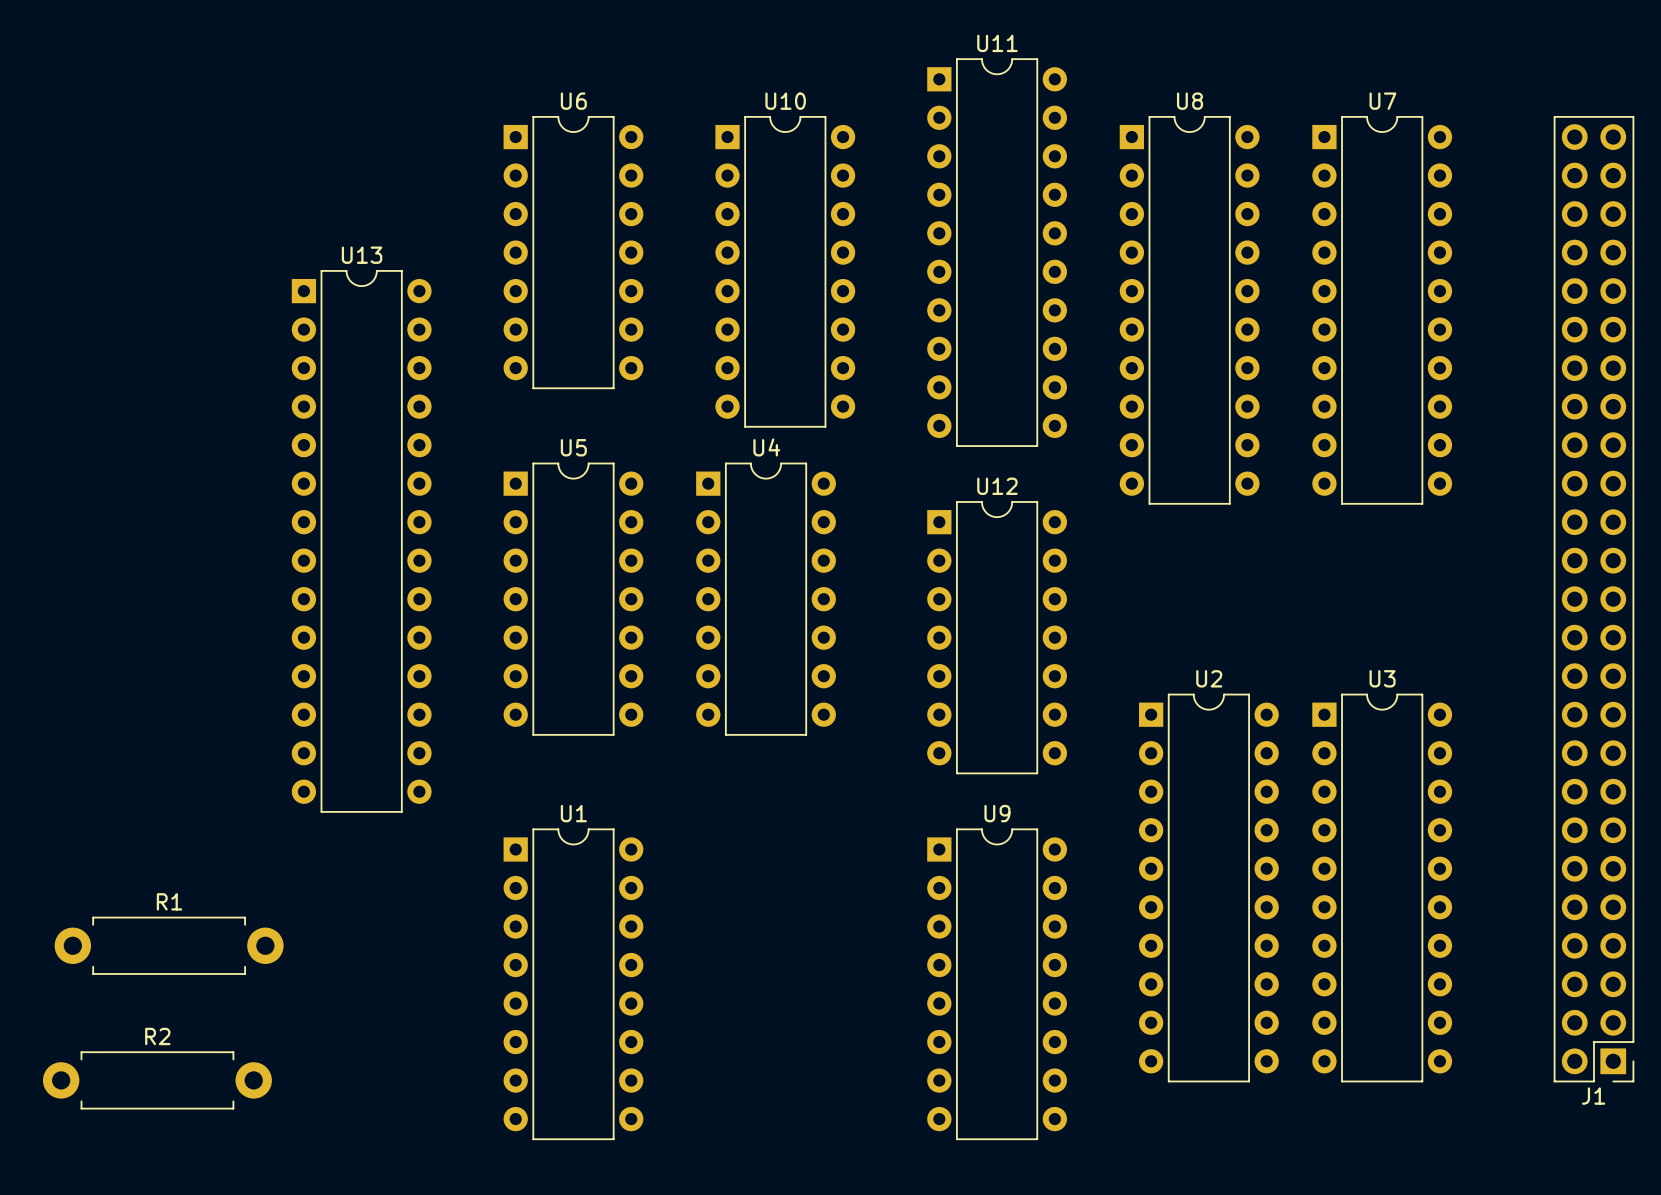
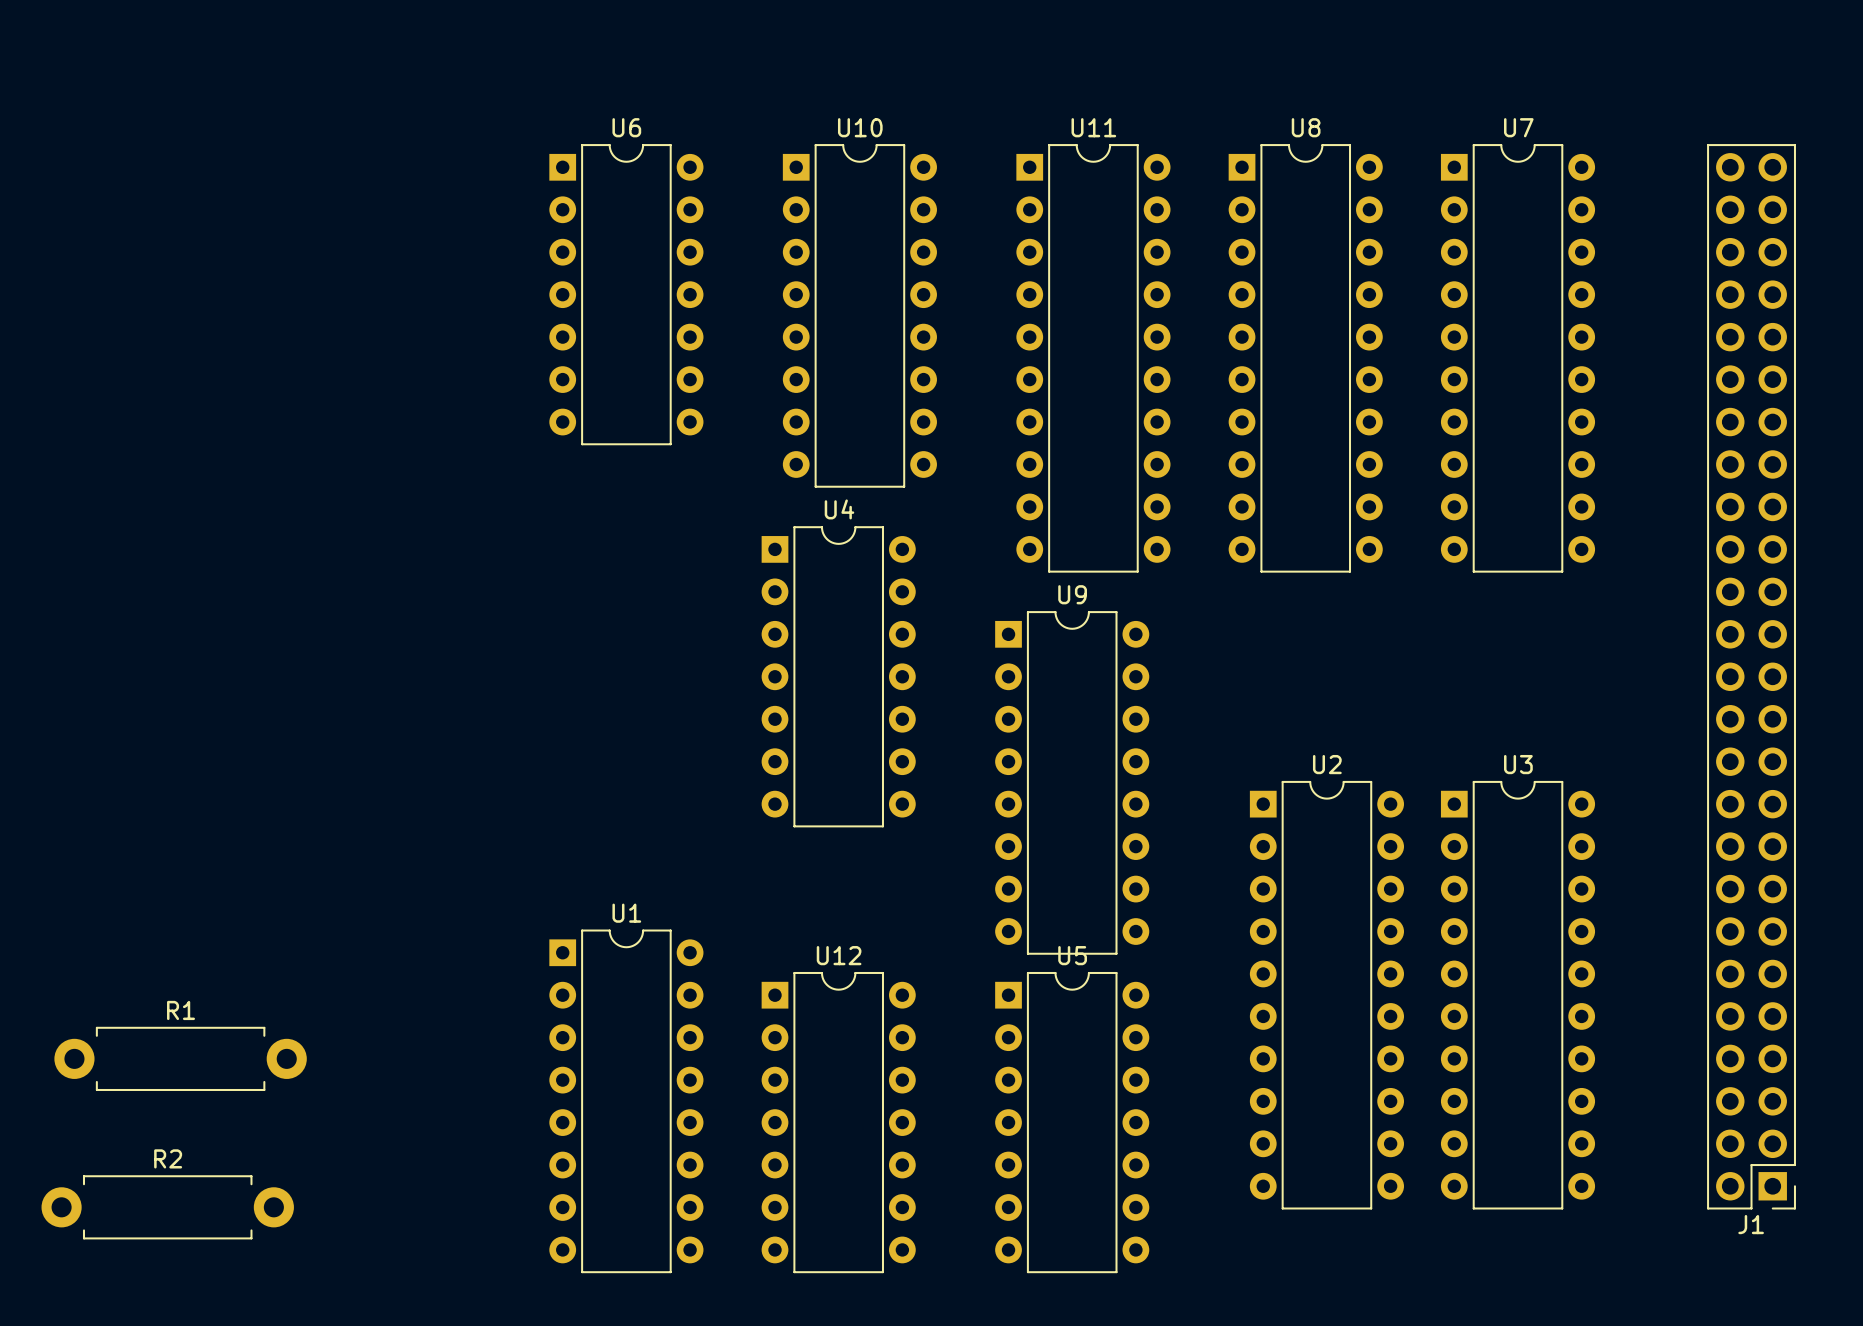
U11 position: (997, 252) -> (1093, 358)
U13: (361, 541) -> none
U5 position: (573, 599) -> (1072, 1122)
U12 position: (997, 637) -> (838, 1122)
U9 position: (997, 984) -> (1072, 782)

